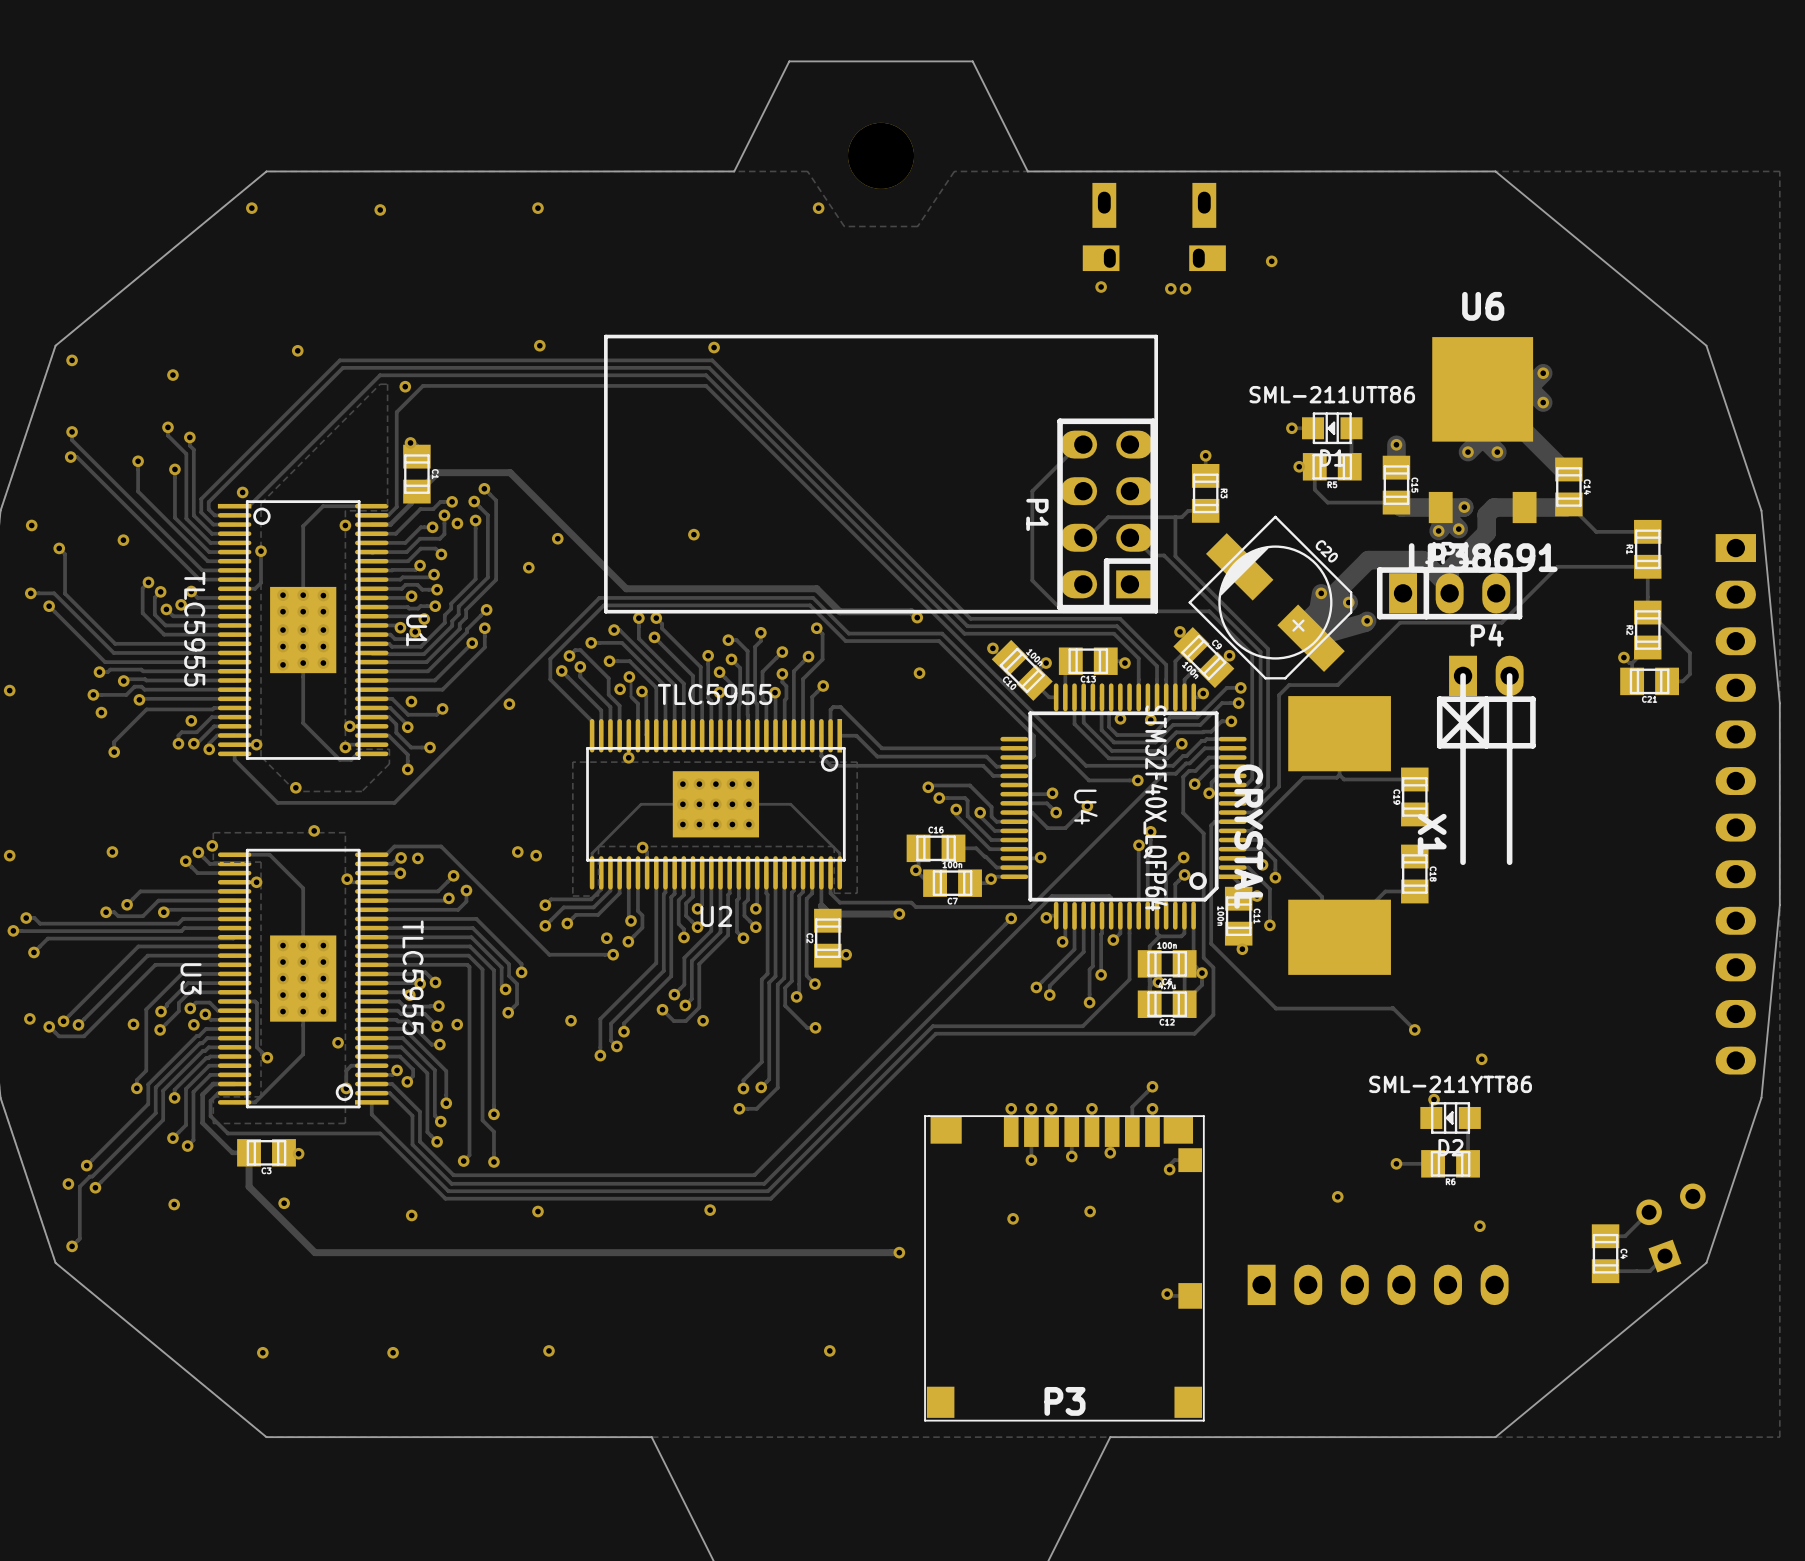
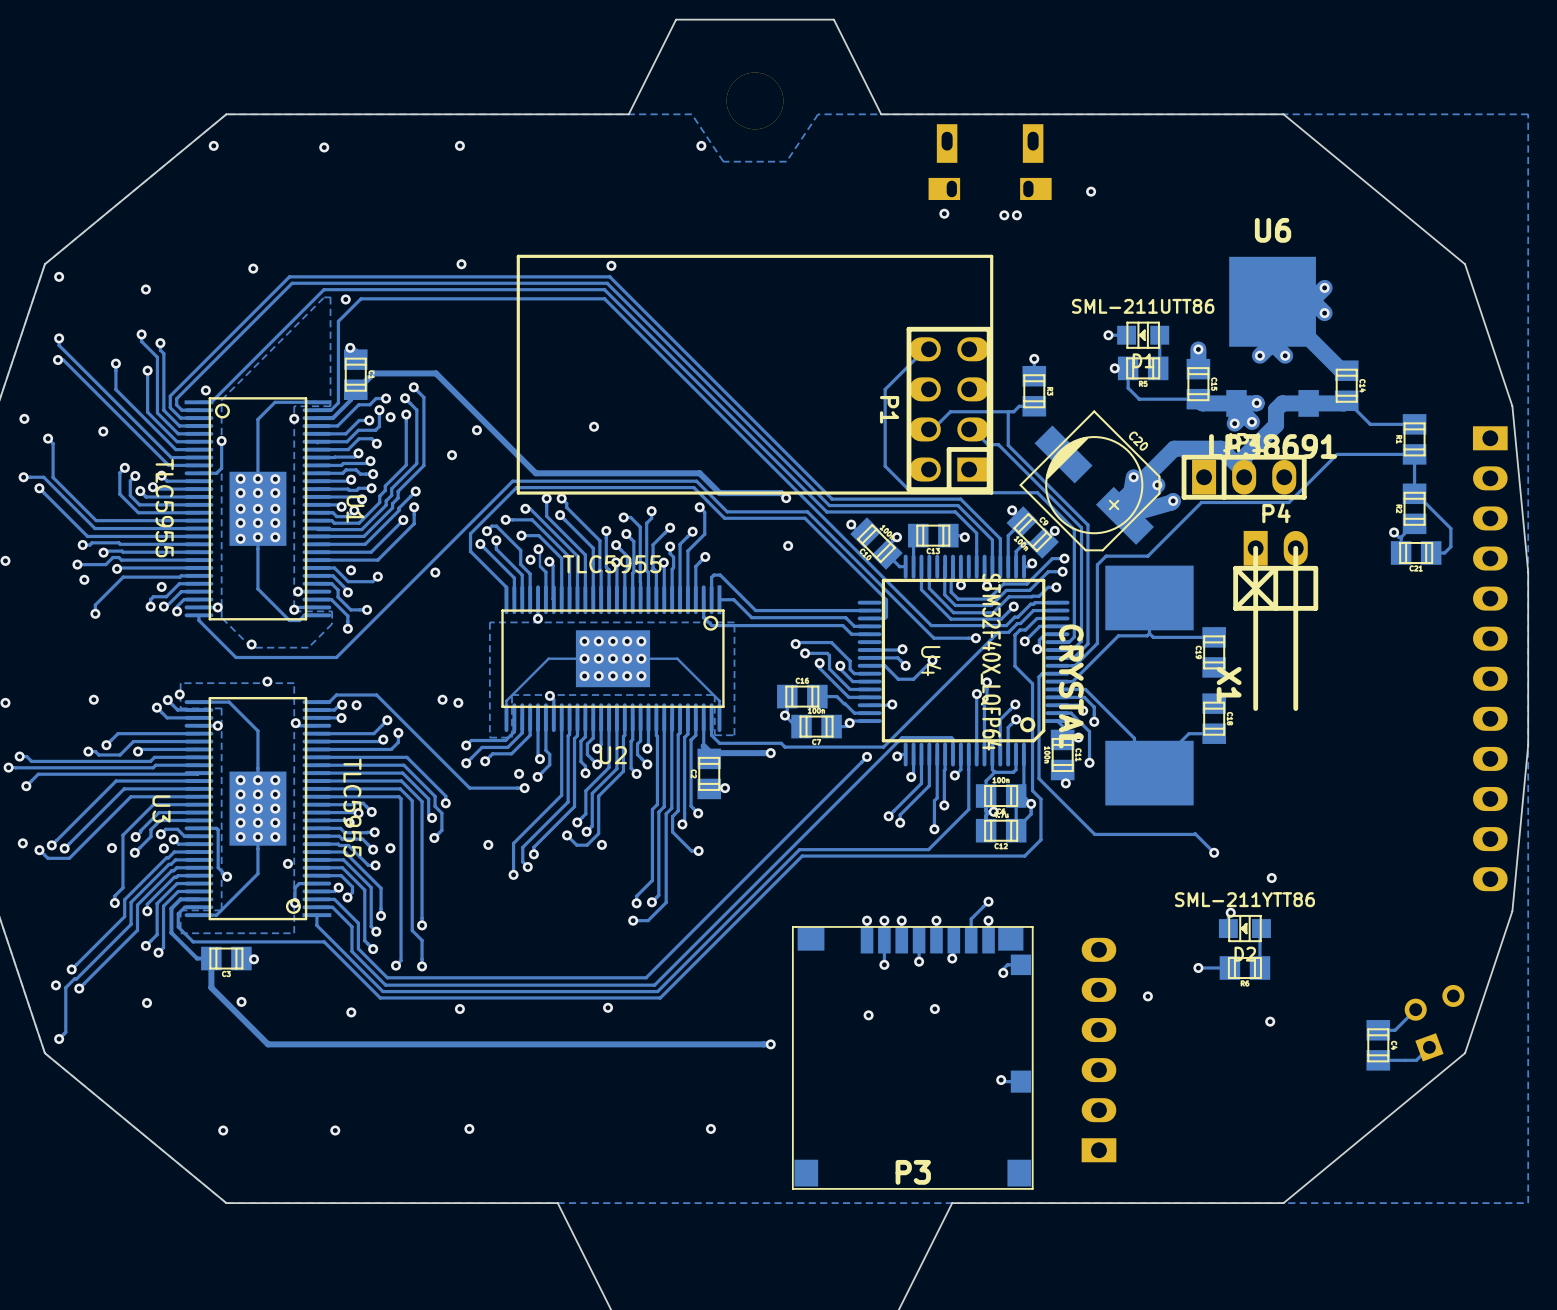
part rotation: 0° (1378, 1284) -> 90° counterclockwise (1098, 1050)

